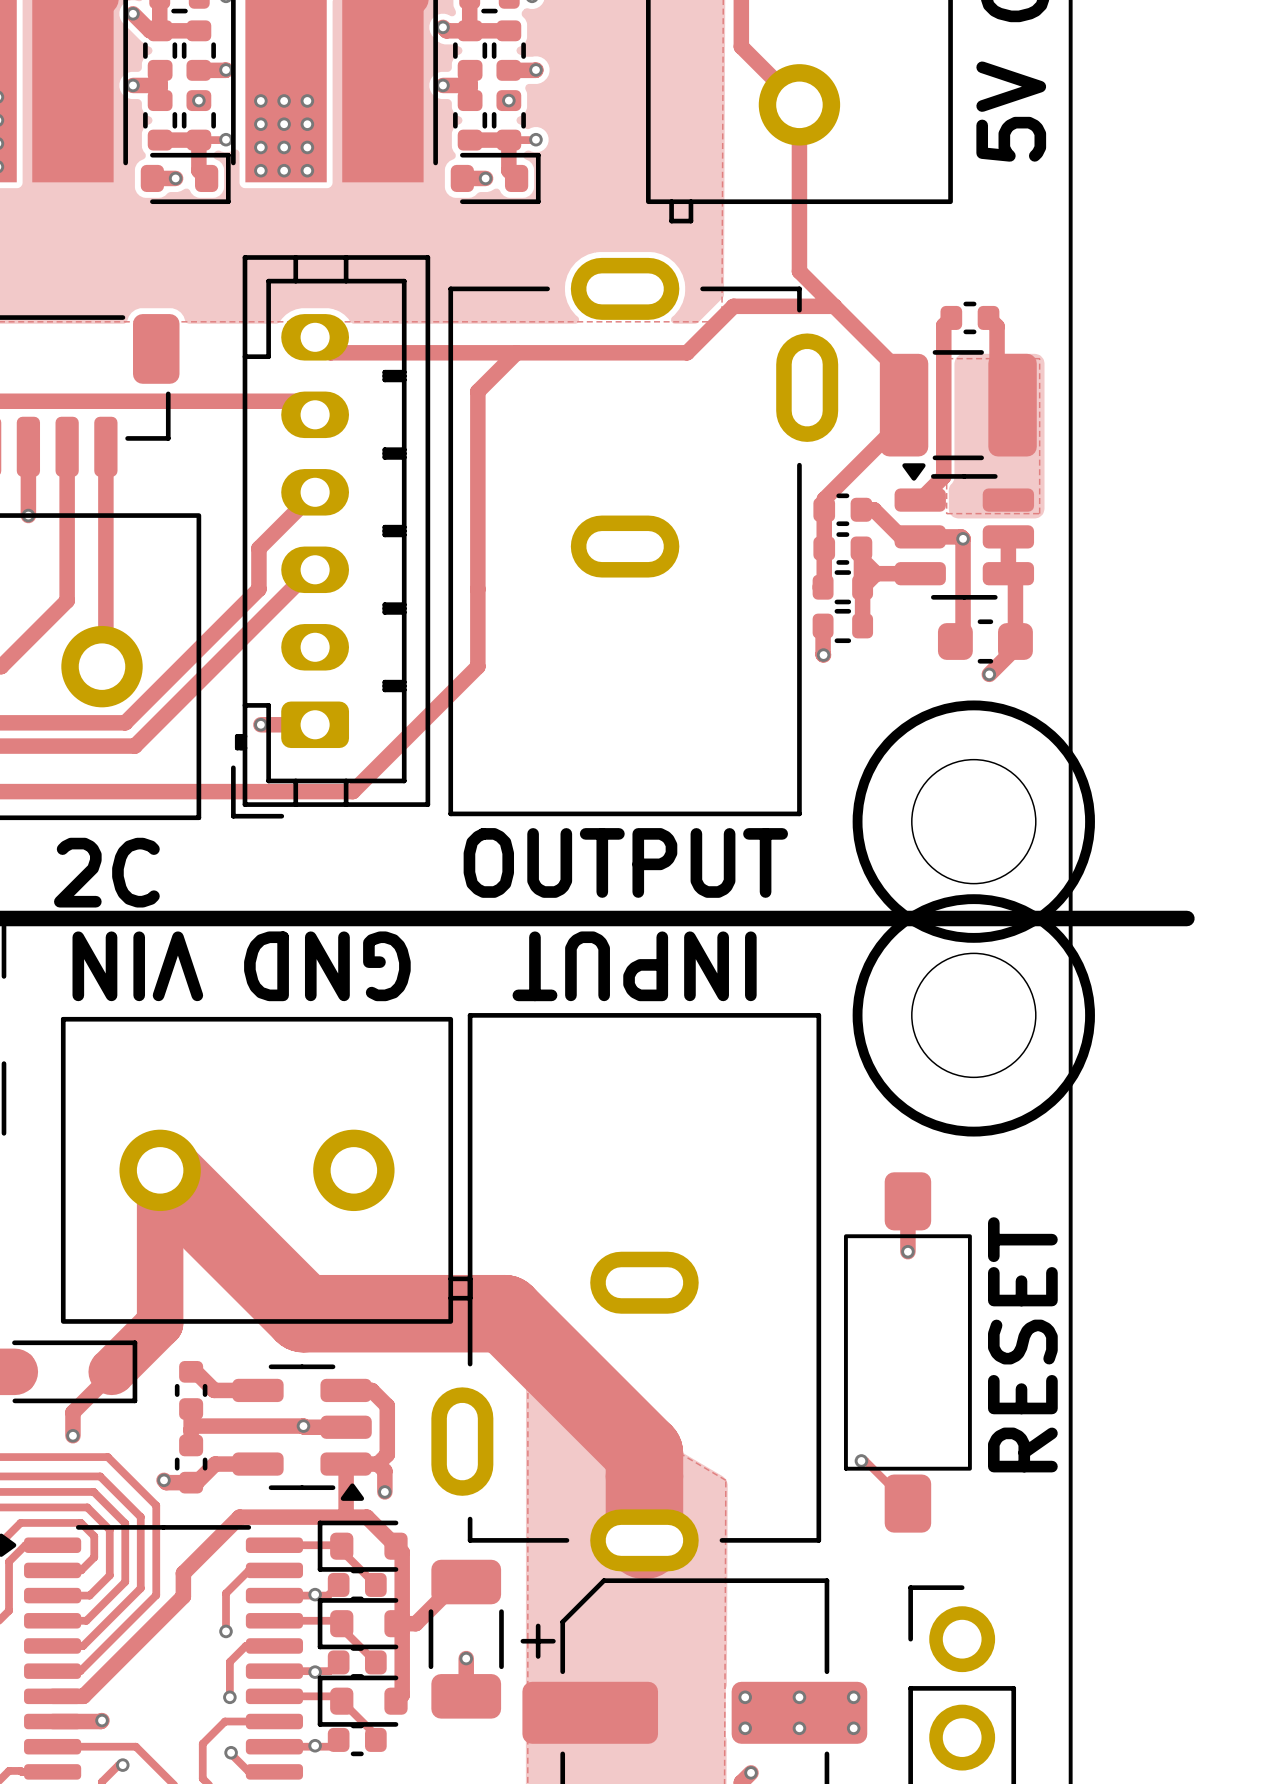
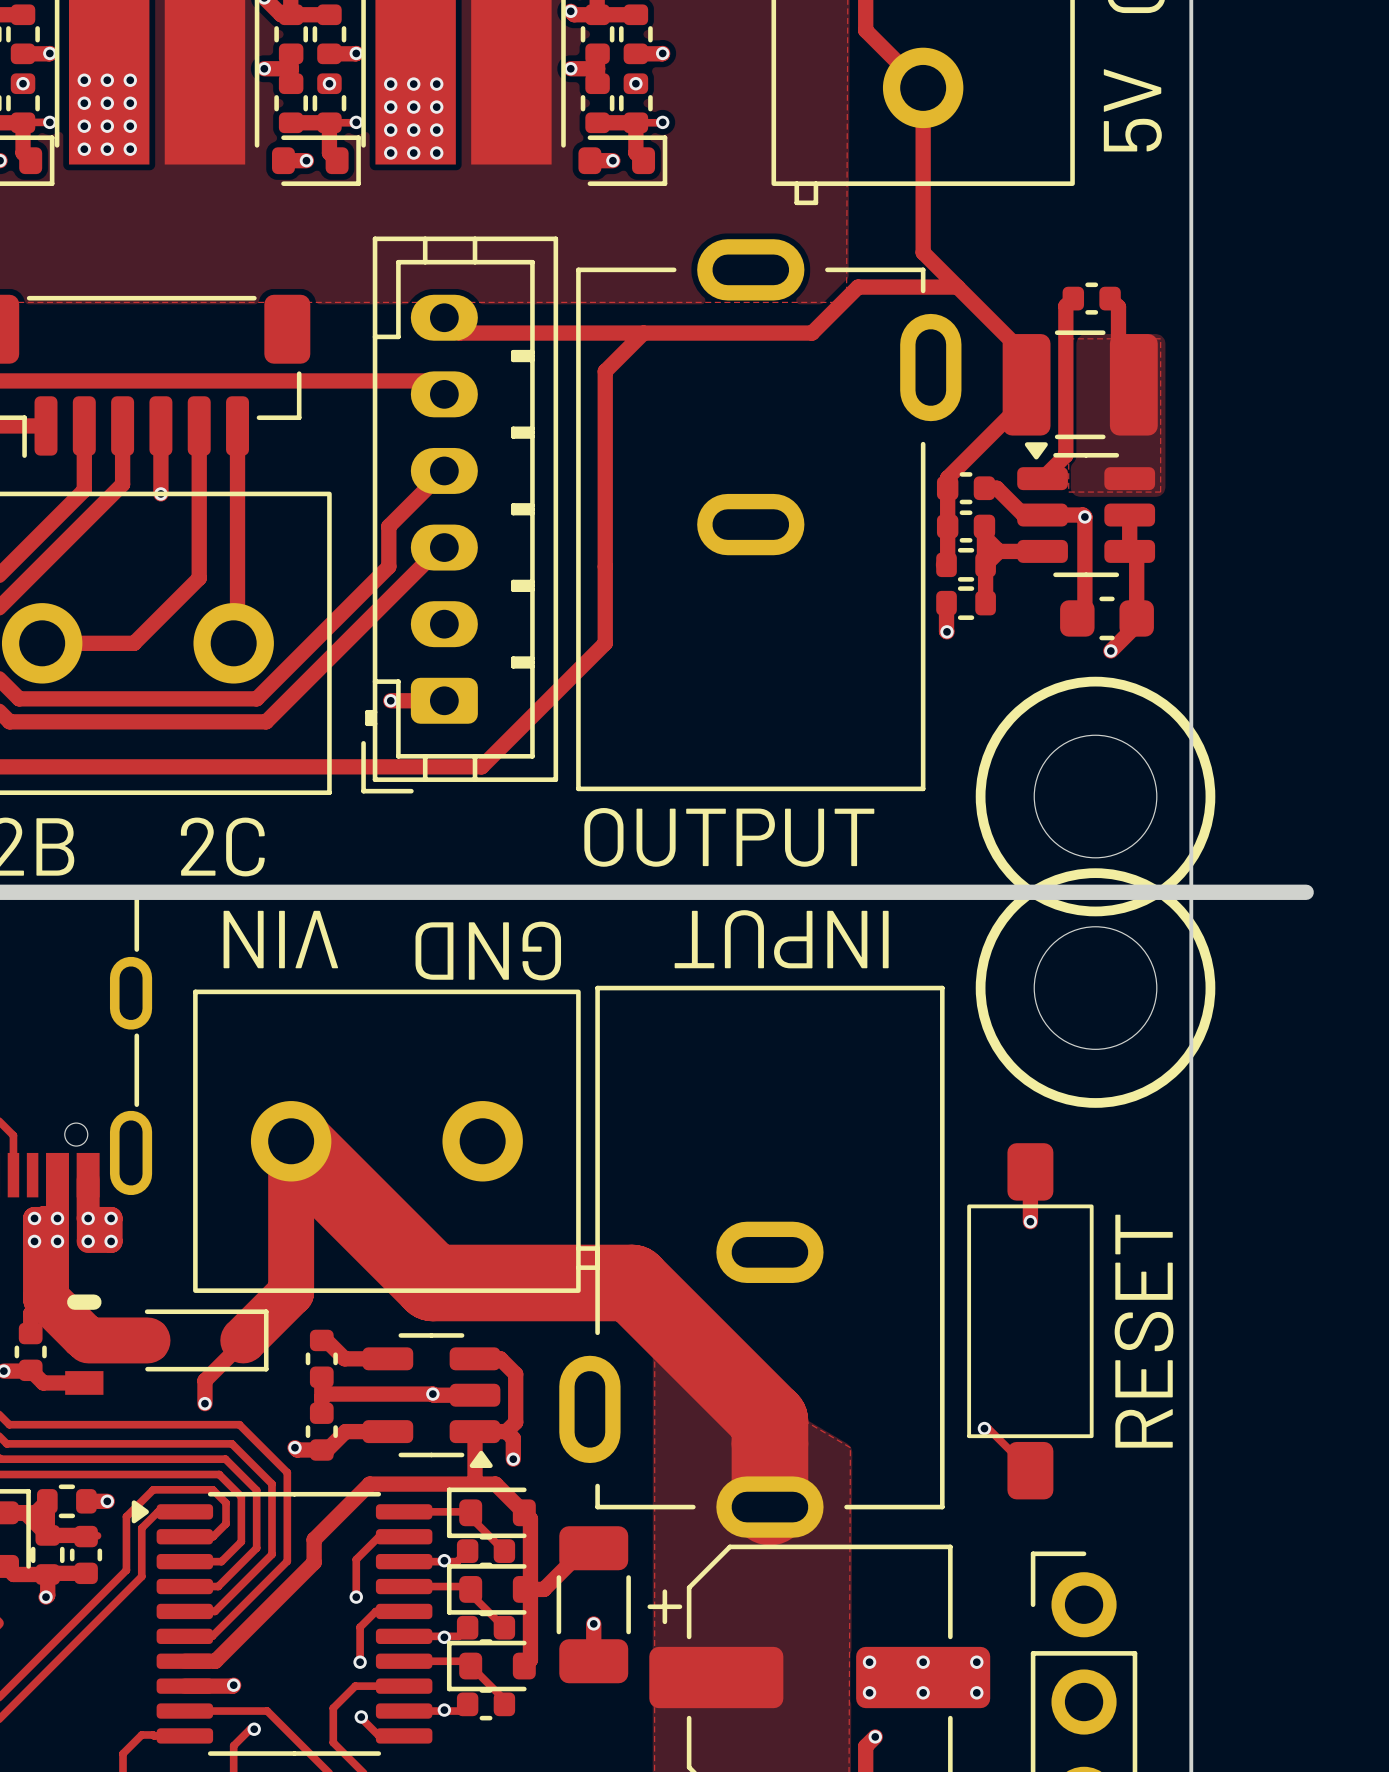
text position: GND (327, 966) -> GND (488, 951)

